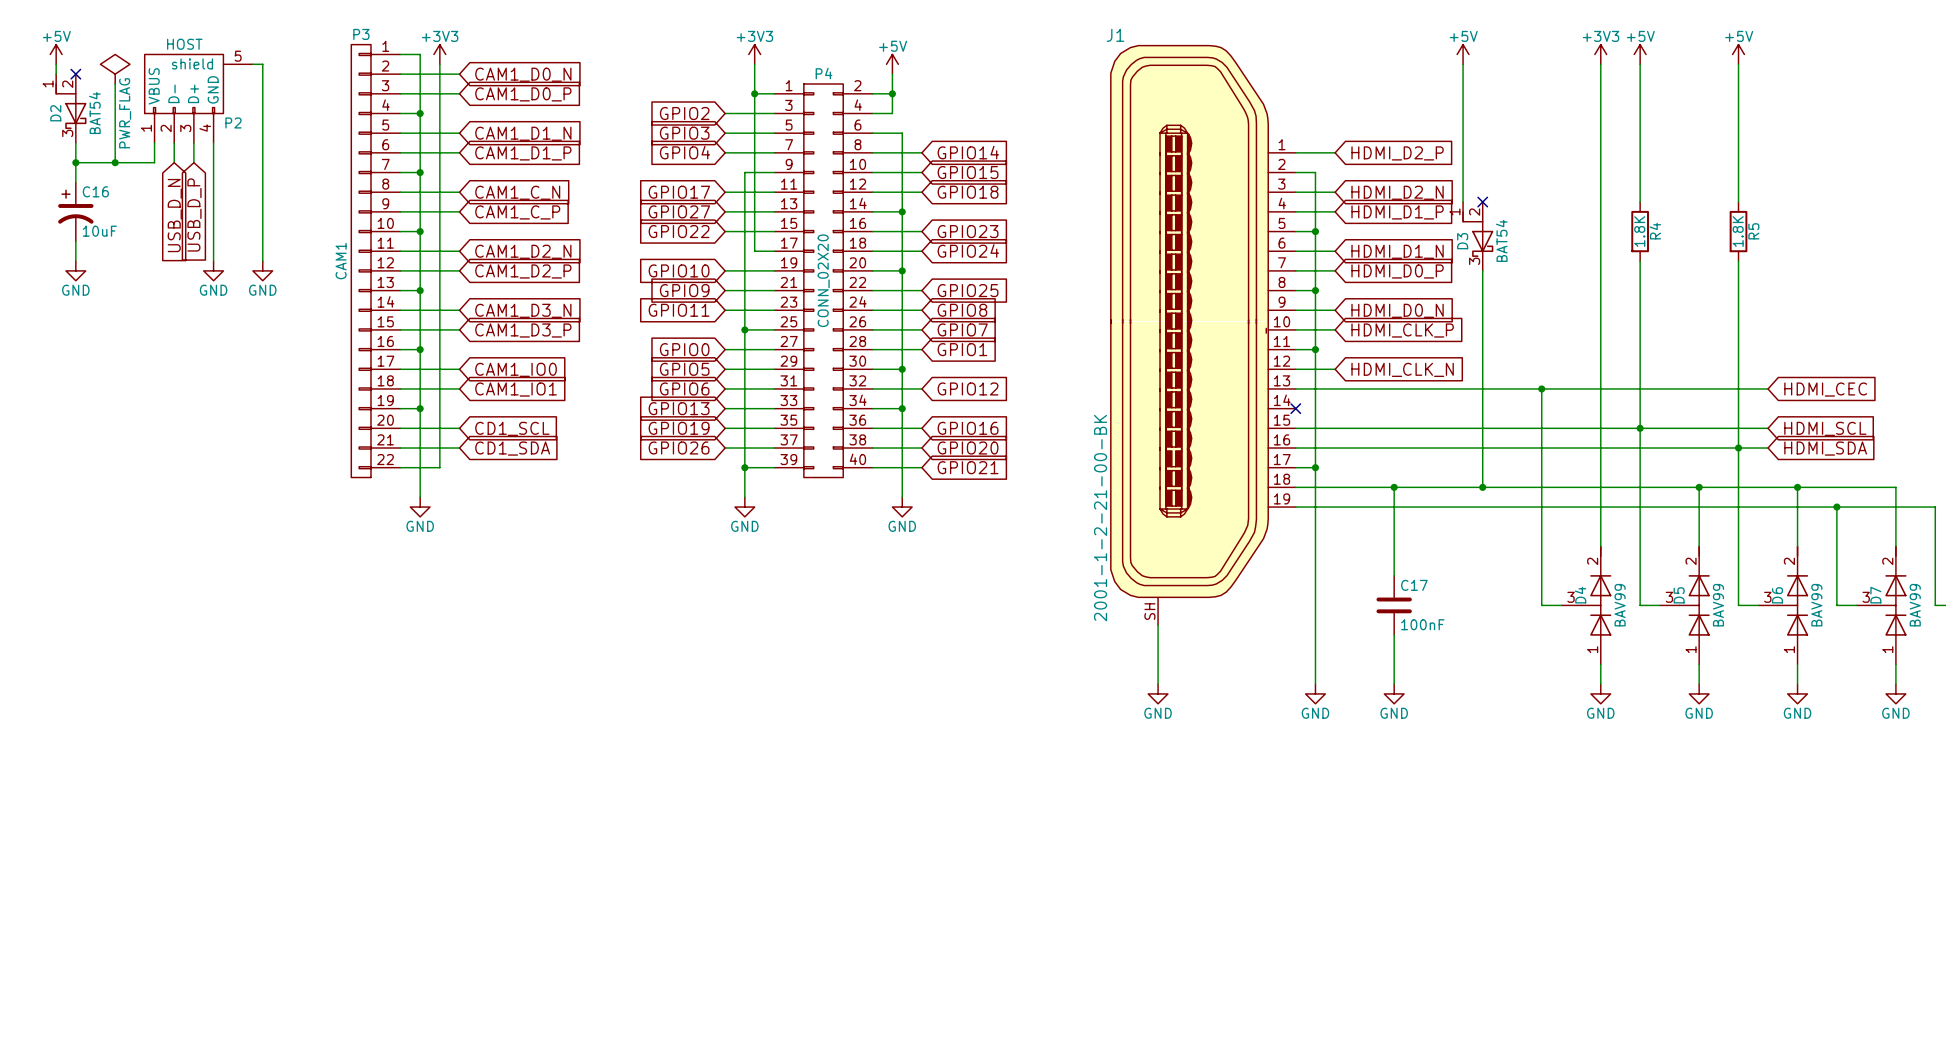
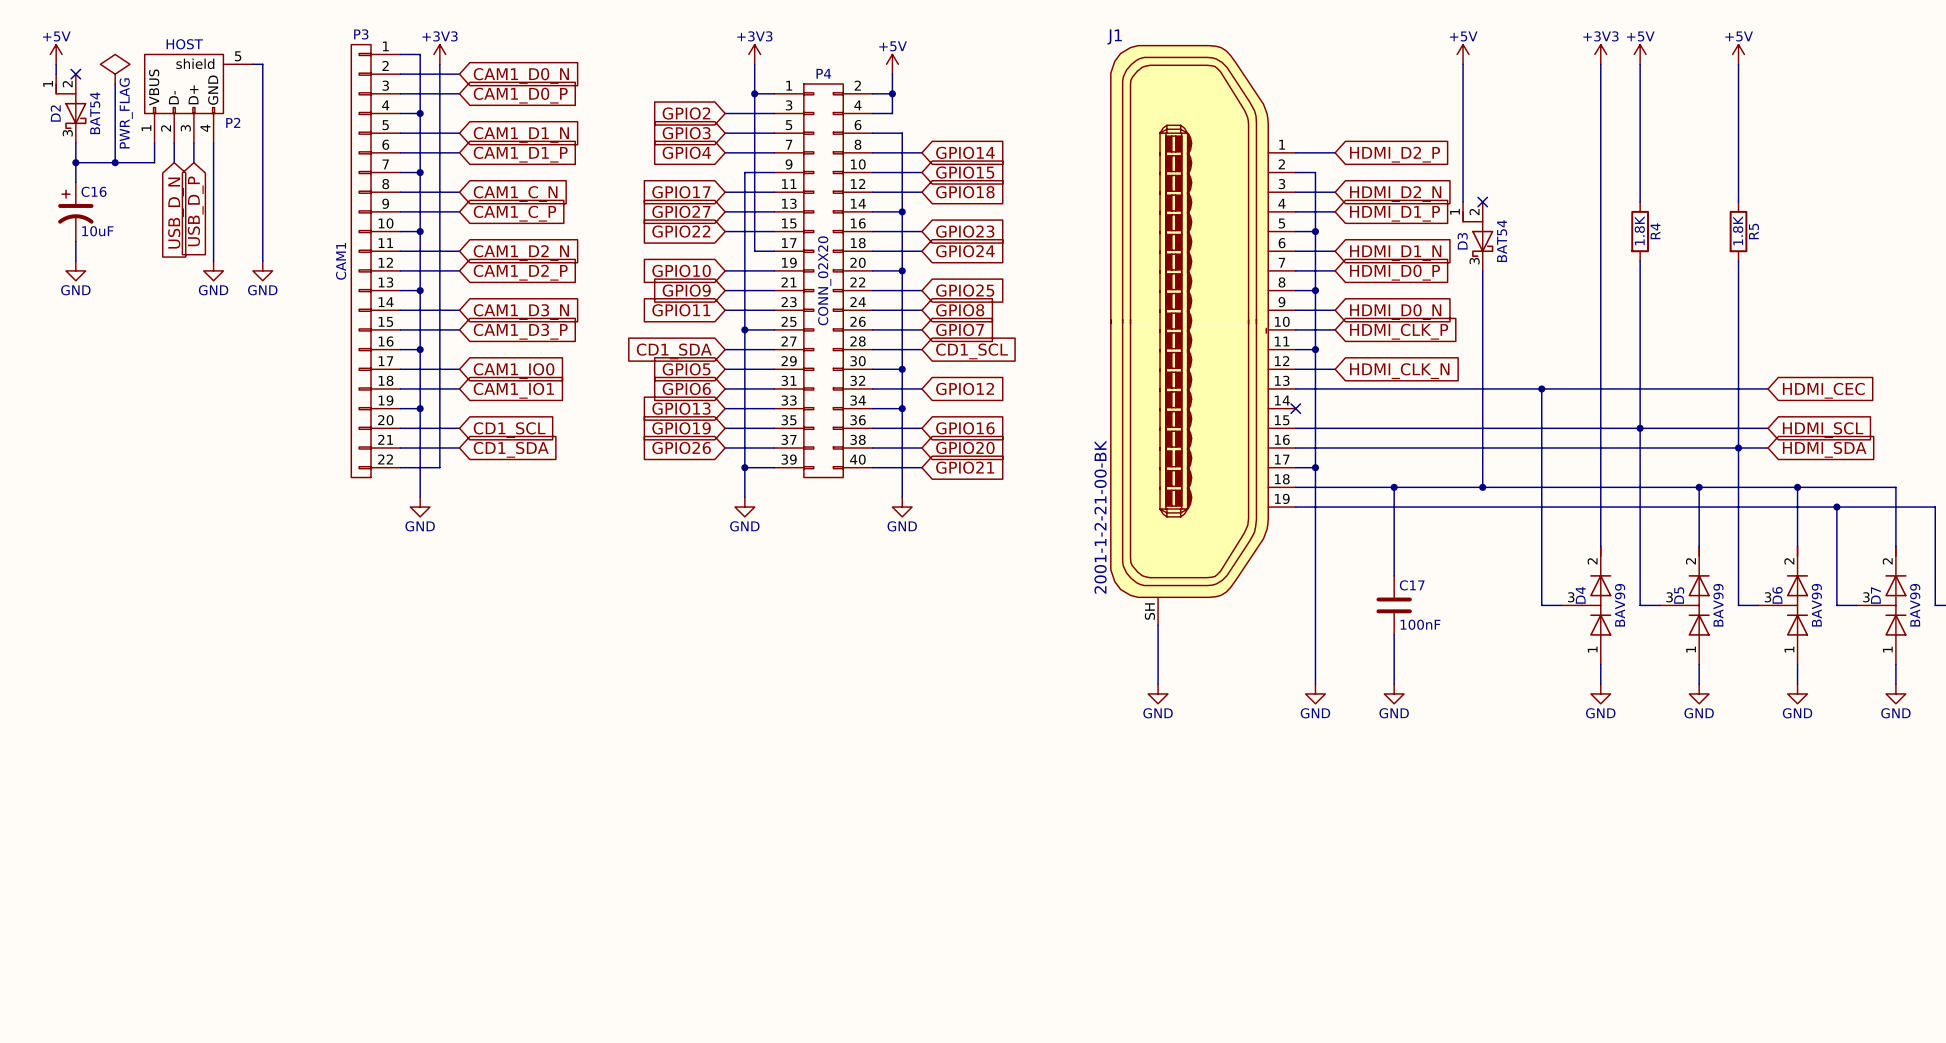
global label: GPIO0 (684, 349) -> CD1_SDA (674, 351)
global label: GPIO1 (962, 349) -> CD1_SCL (972, 351)

